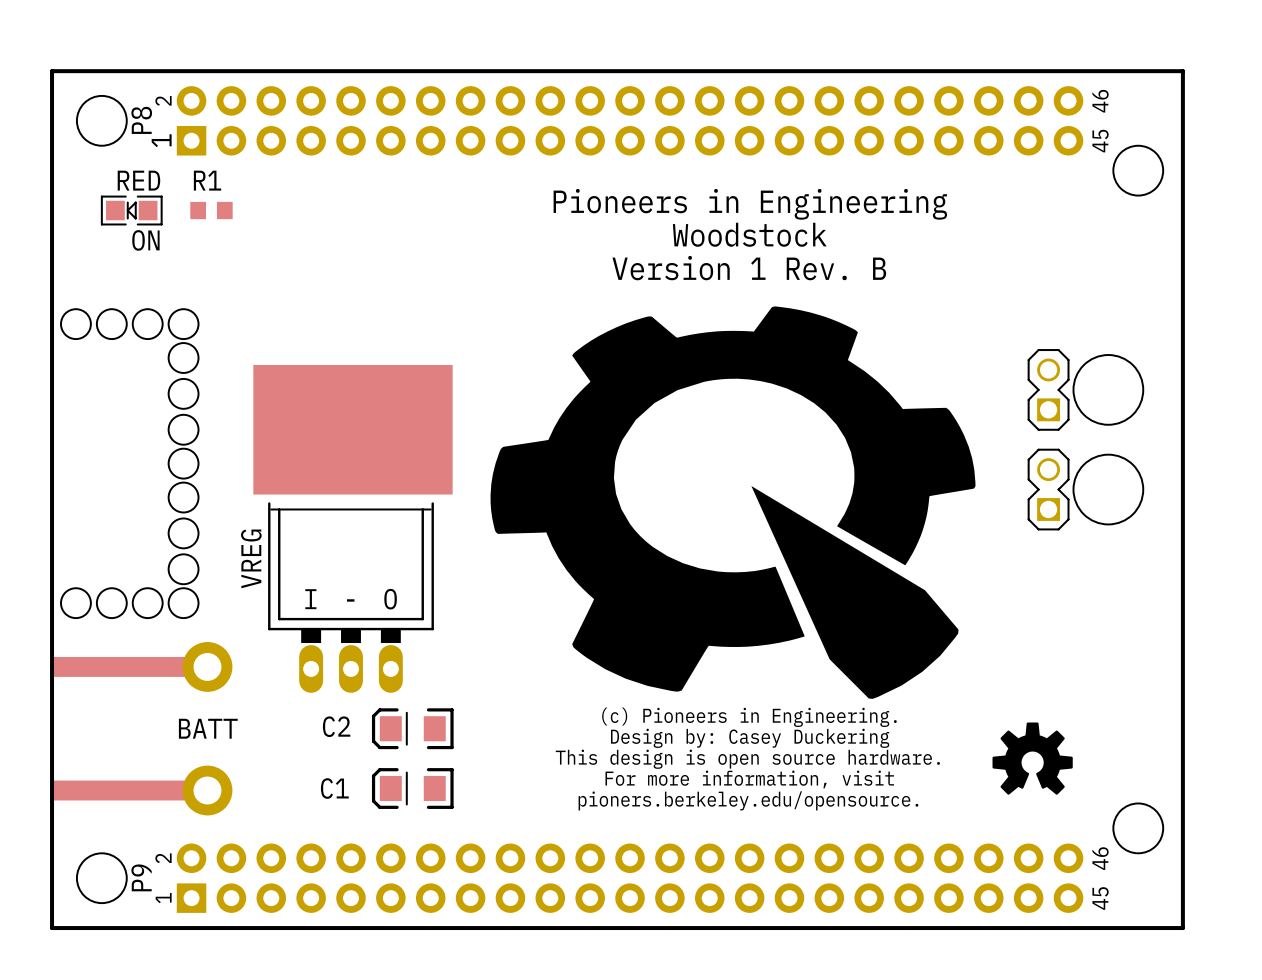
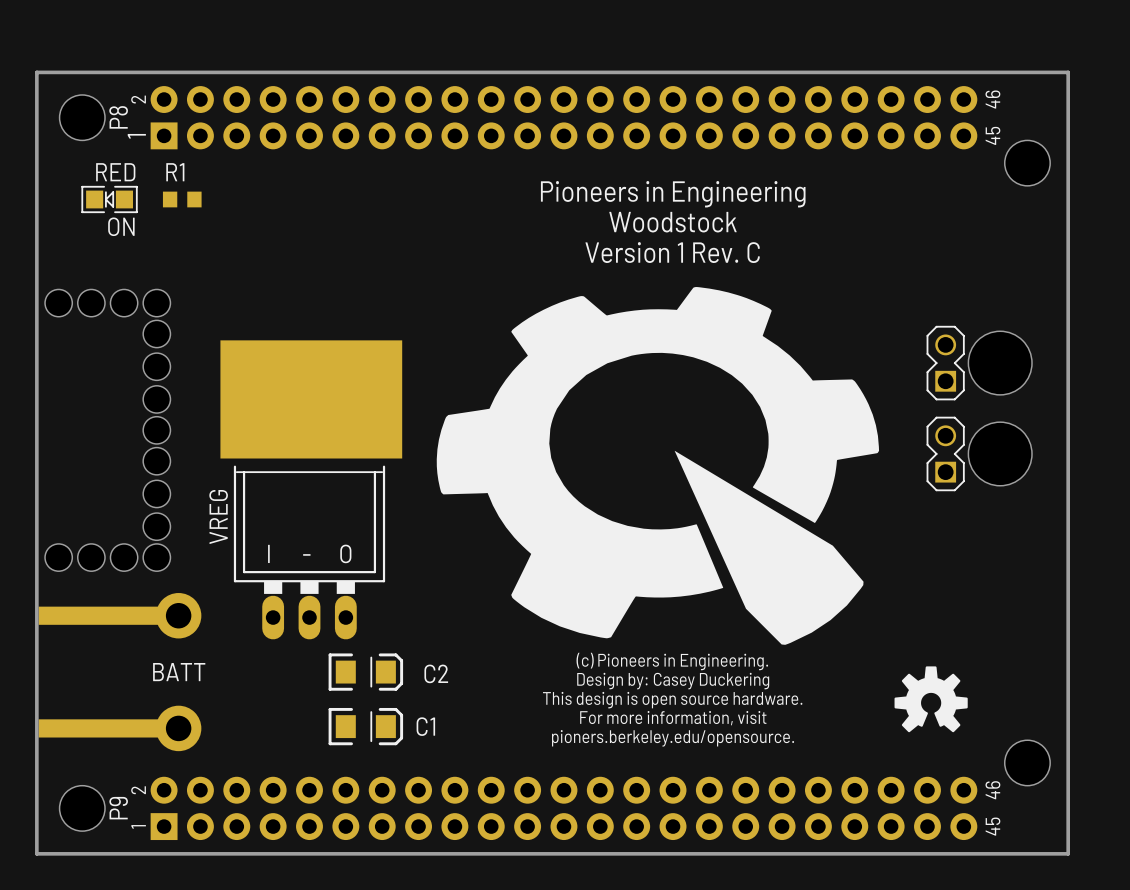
text: Version 1 Rev. B (749, 268) -> Version 1 Rev. C (672, 252)
C2 rotation: 0° (412, 728) -> 180° (365, 672)
C1 rotation: 0° (412, 788) -> 180° (365, 726)

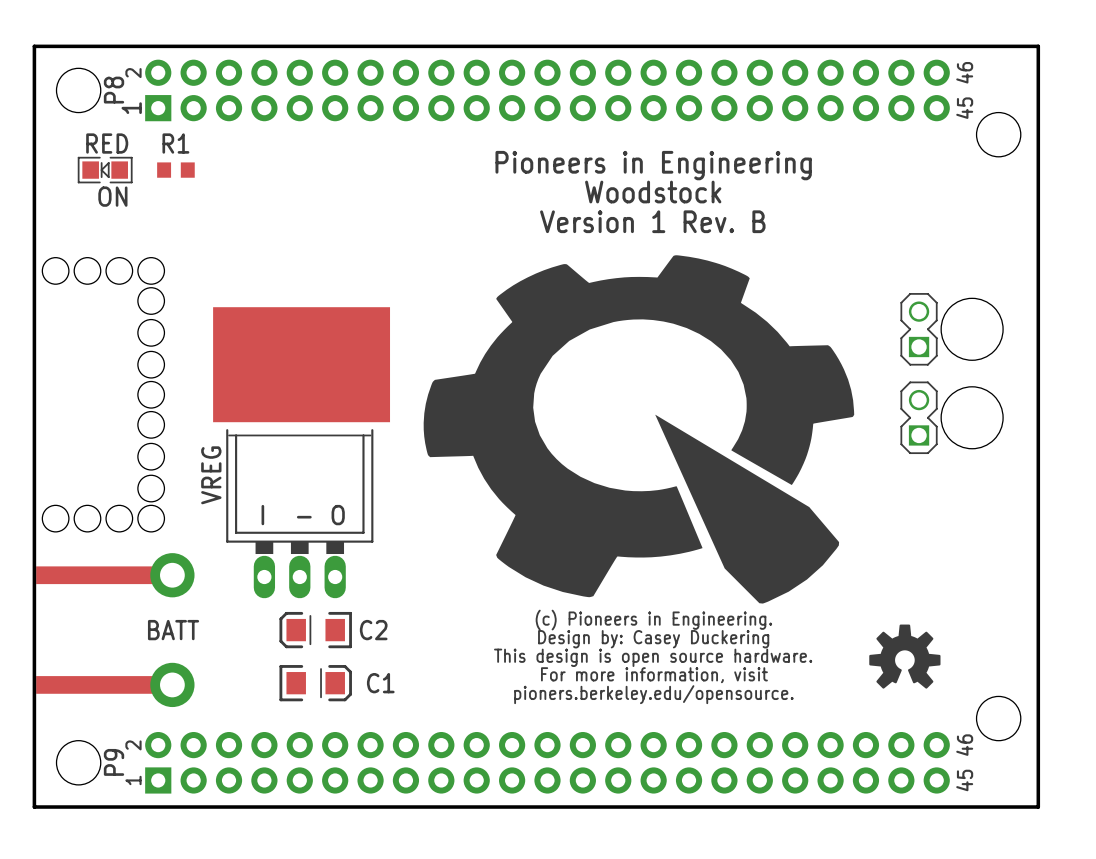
text: Version 1 Rev. C (672, 252) -> Version 1 Rev. B (652, 221)
C2 rotation: 0° (365, 672) -> 180° (315, 630)
C1 position: (365, 726) -> (315, 683)

